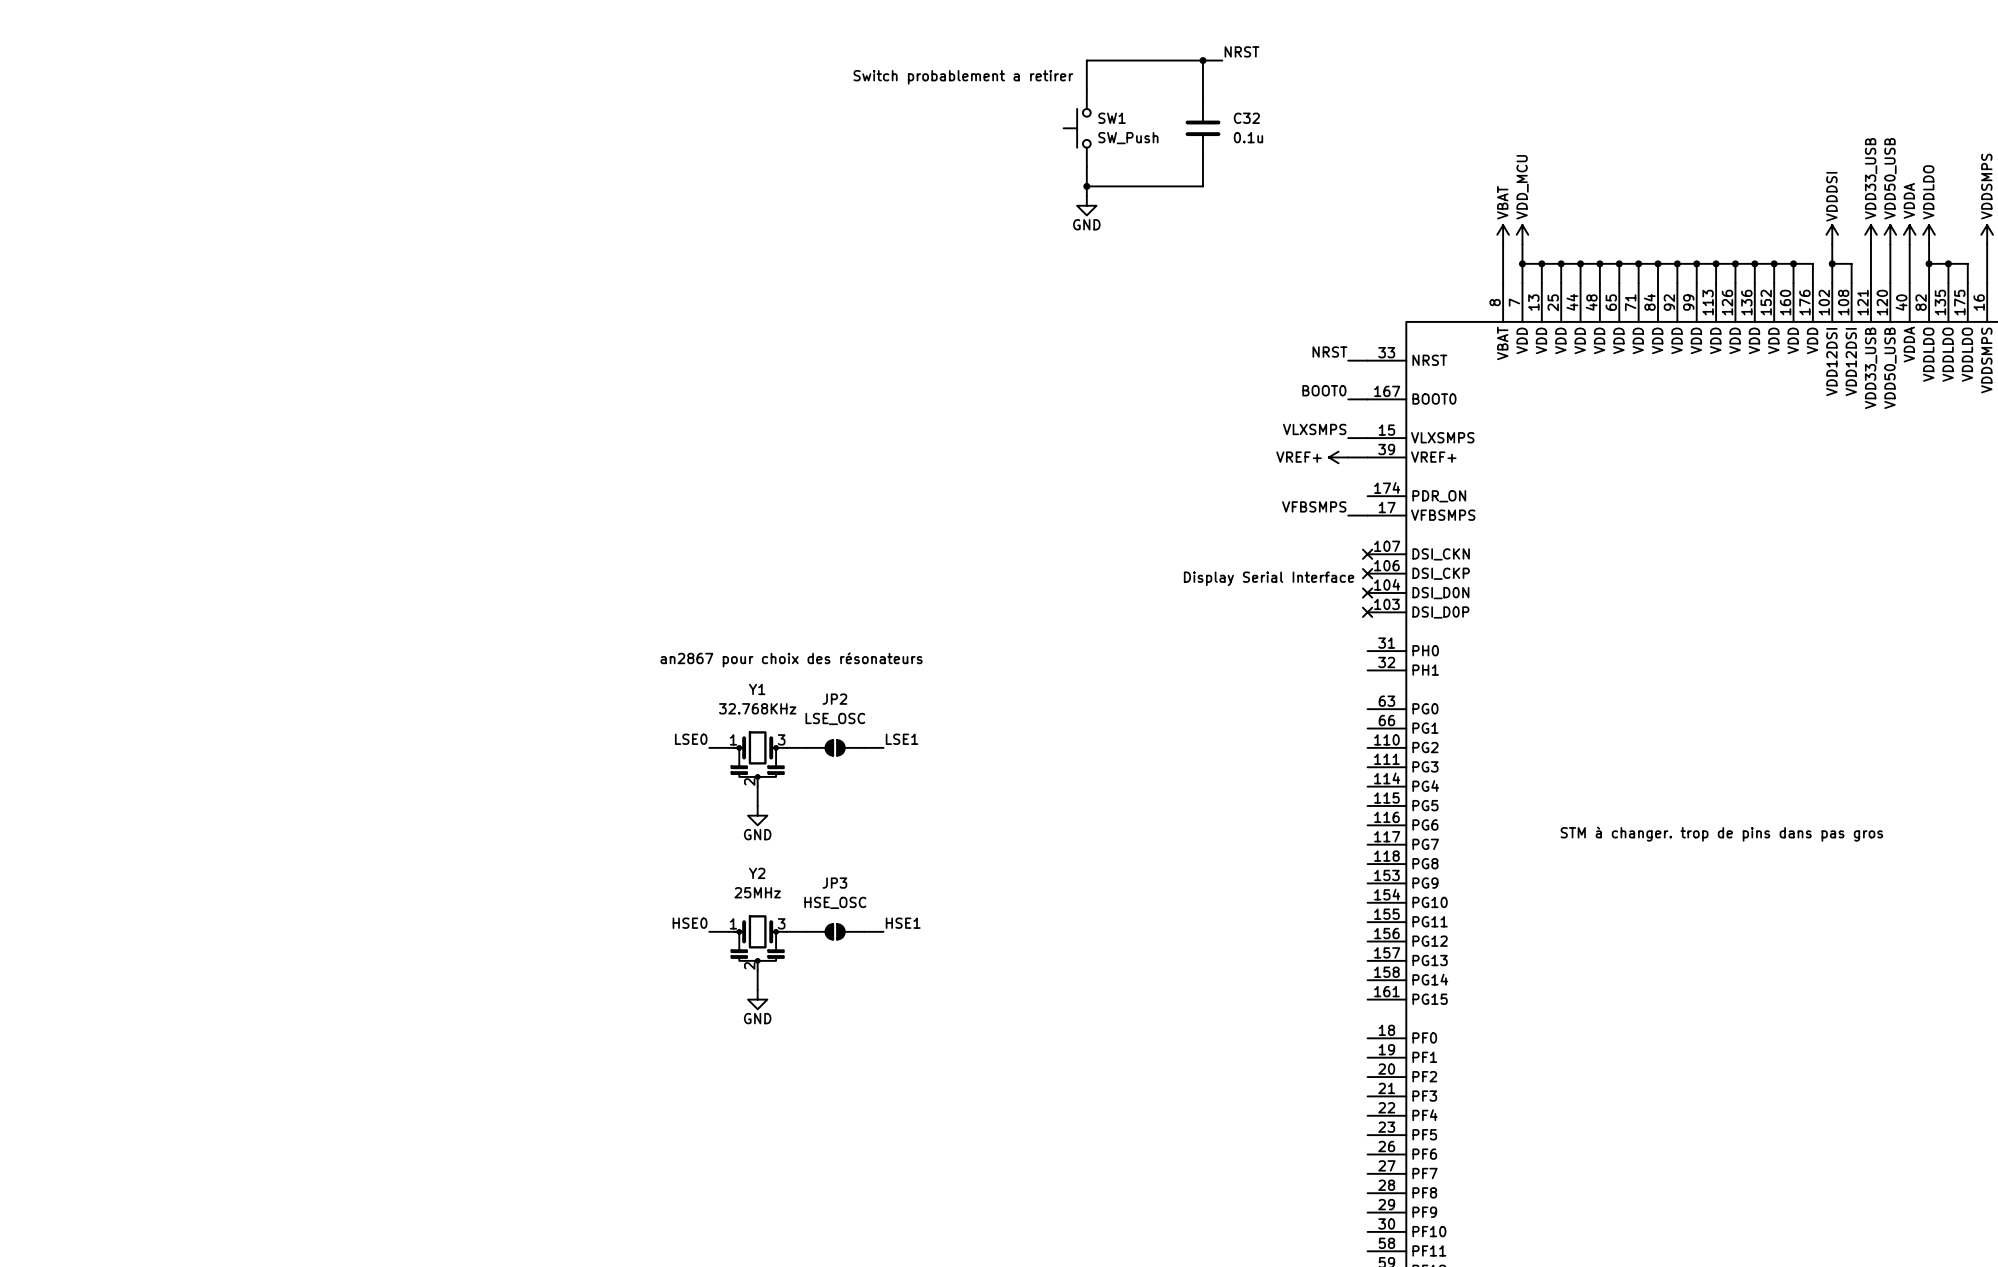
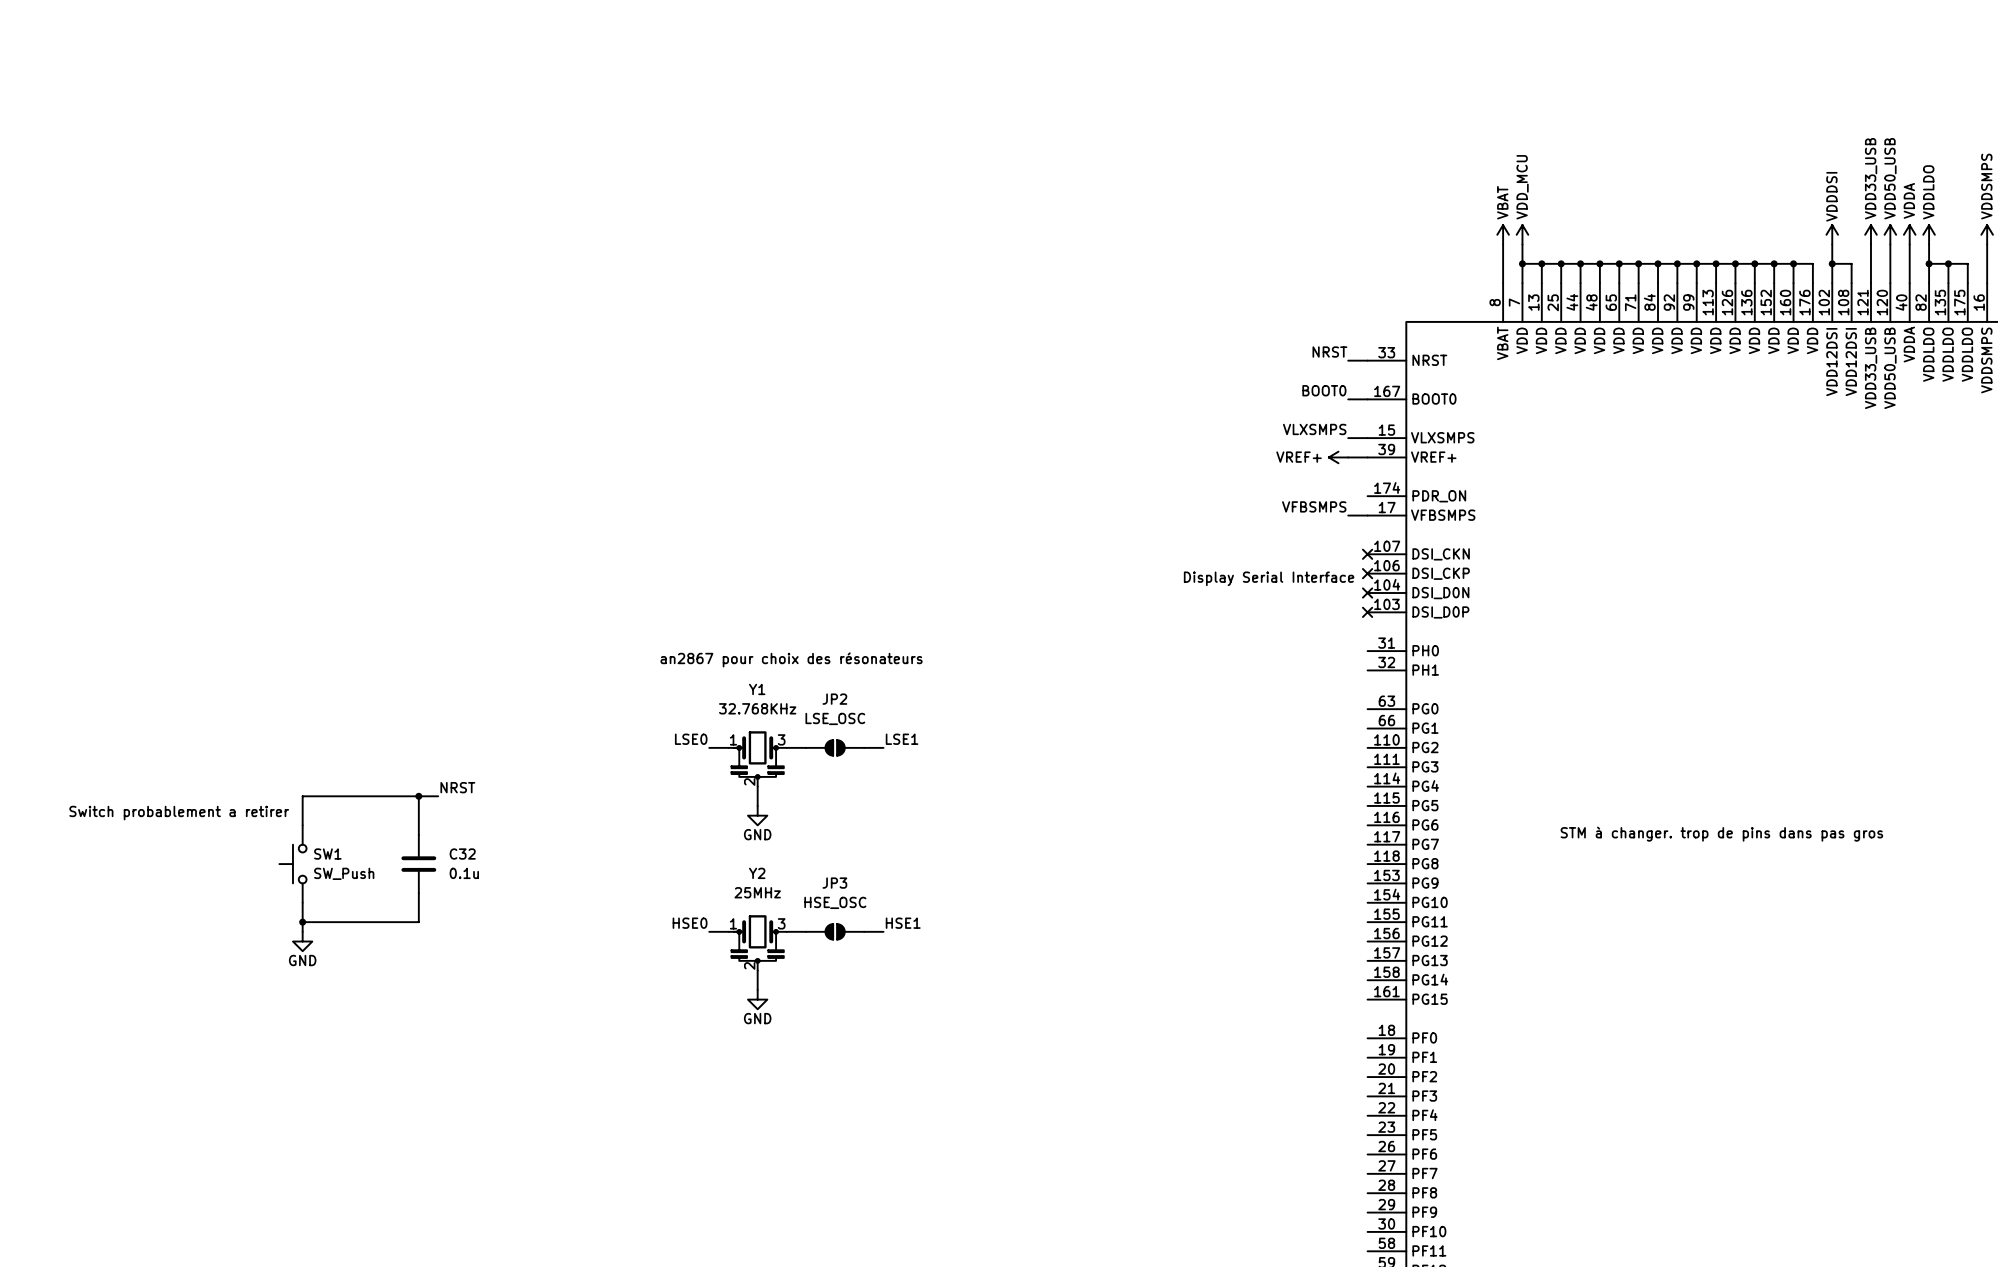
label: NRST (1242, 51) -> none
wire: (1203, 60) (1203, 99) -> none
junction: (1203, 60) -> none
wire: (1222, 60) (1086, 60) (1086, 89) -> none
text: Switch probablement a retirer (963, 77) -> none
SW1 position: (1077, 128) -> (292, 864)
C32 position: (1203, 128) -> (418, 864)
wire: (1203, 157) (1203, 186) (1086, 186) -> none
wire: (1086, 167) (1086, 196) -> none
junction: (1086, 186) -> none
power symbol: GND (1086, 205) -> none
label: none -> NRST (457, 787)
wire: none -> (418, 796) (418, 835)
junction: none -> (418, 796)
wire: none -> (438, 796) (302, 796) (302, 825)
text: none -> Switch probablement a retirer (179, 813)
wire: none -> (418, 893) (418, 922) (302, 922)
wire: none -> (302, 902) (302, 931)
junction: none -> (302, 922)
power symbol: none -> GND (302, 941)

